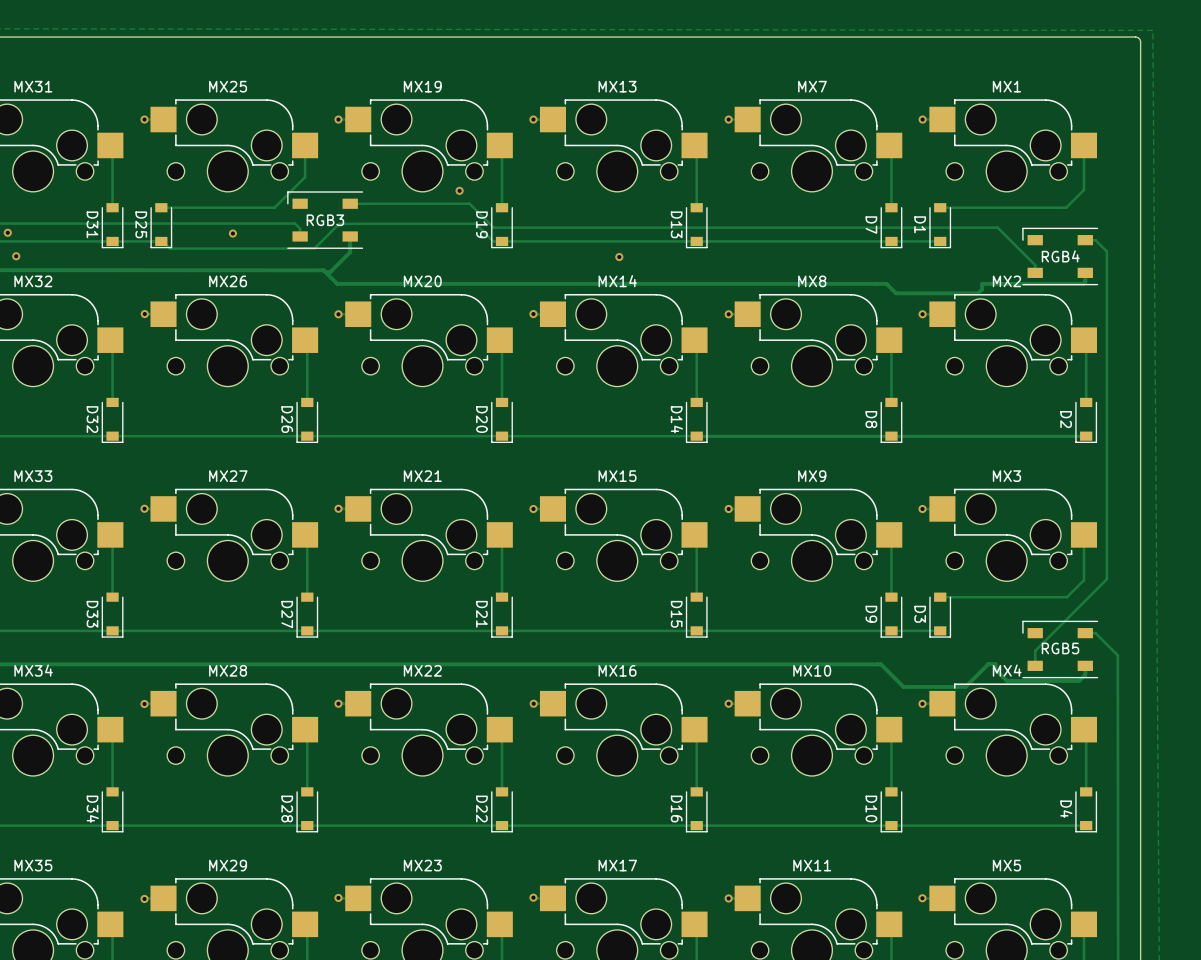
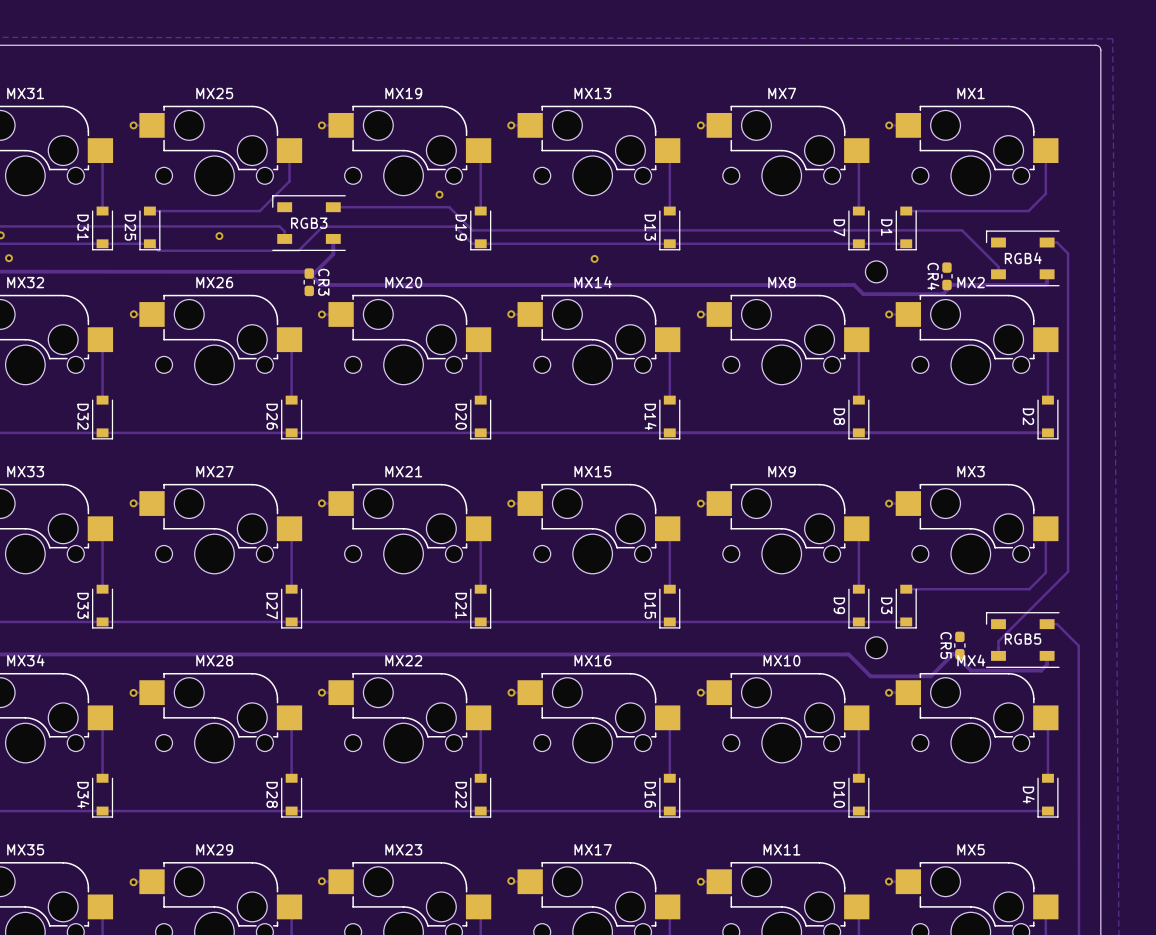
part: none -> (876, 271)
CR4: none -> (946, 276)
CR3: none -> (309, 282)
CR5: none -> (959, 645)
part: none -> (876, 647)

